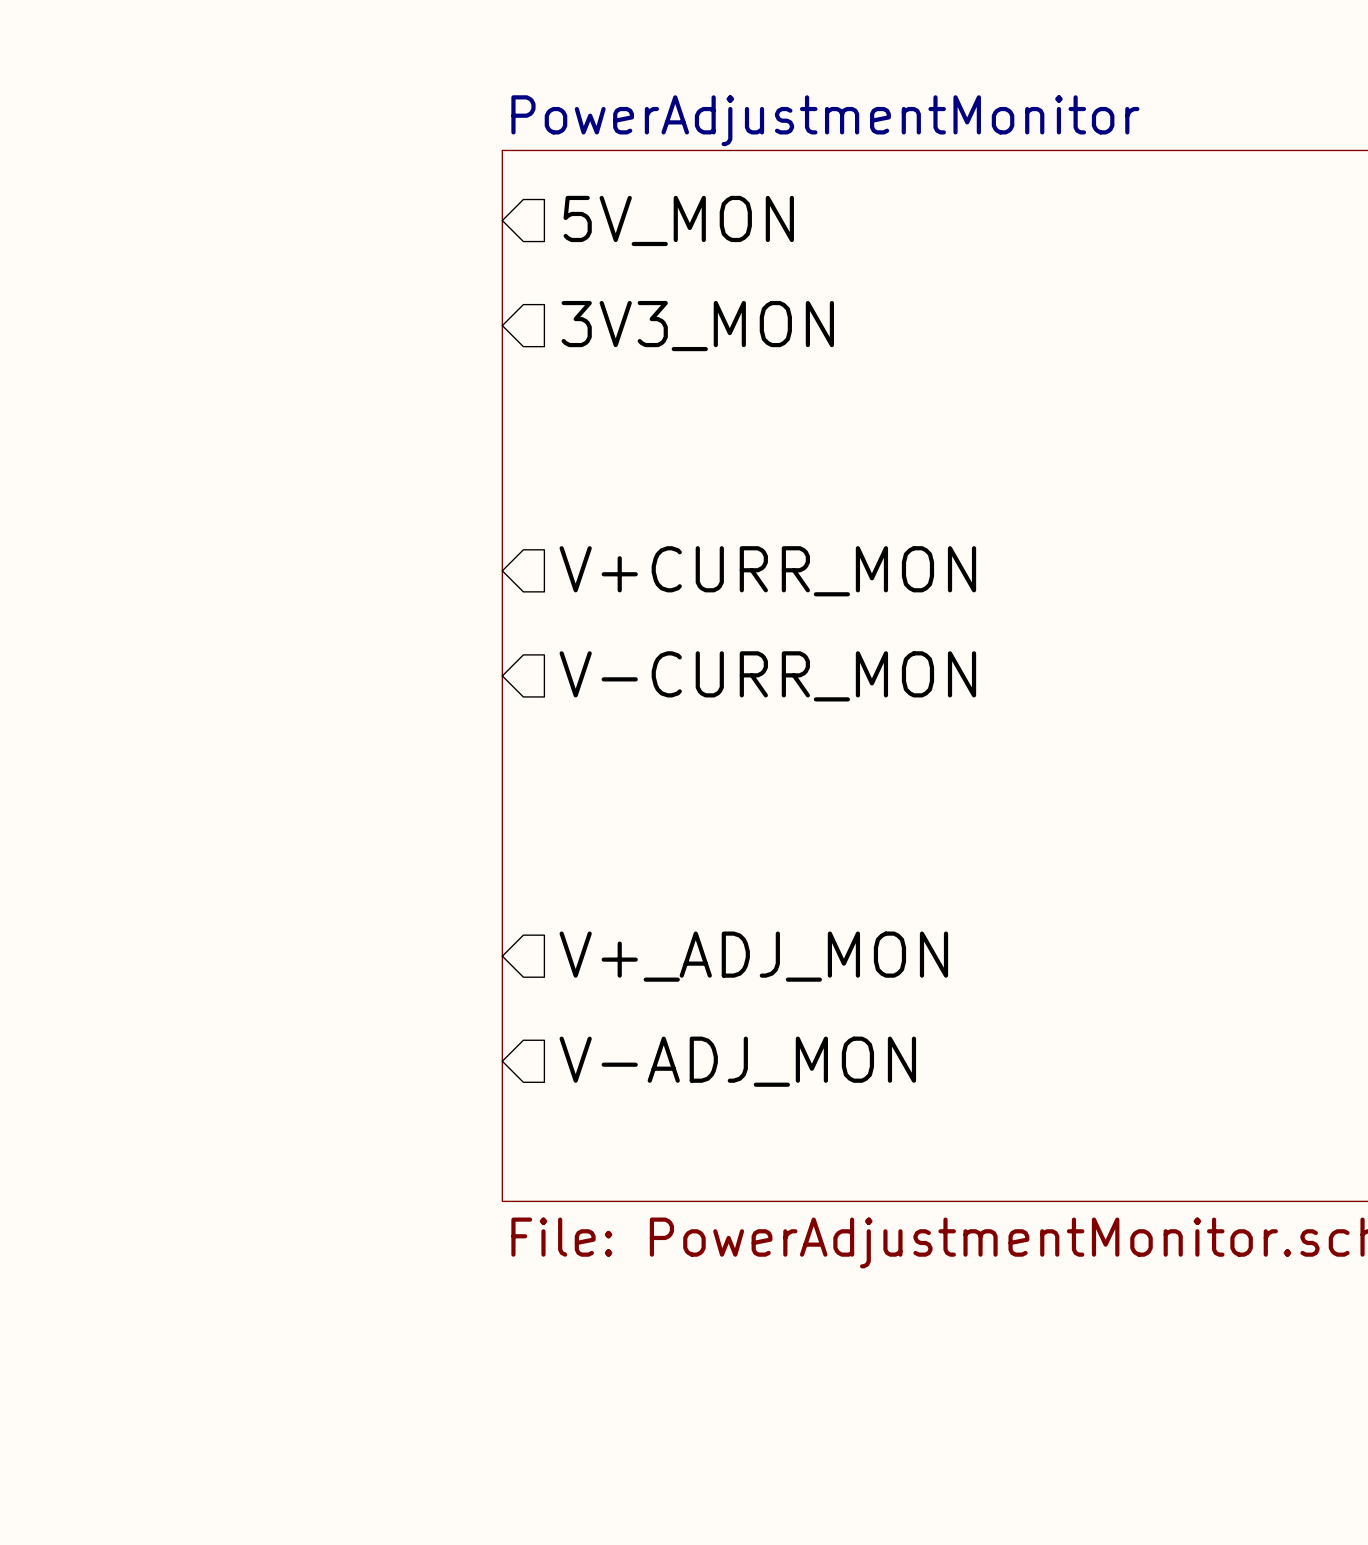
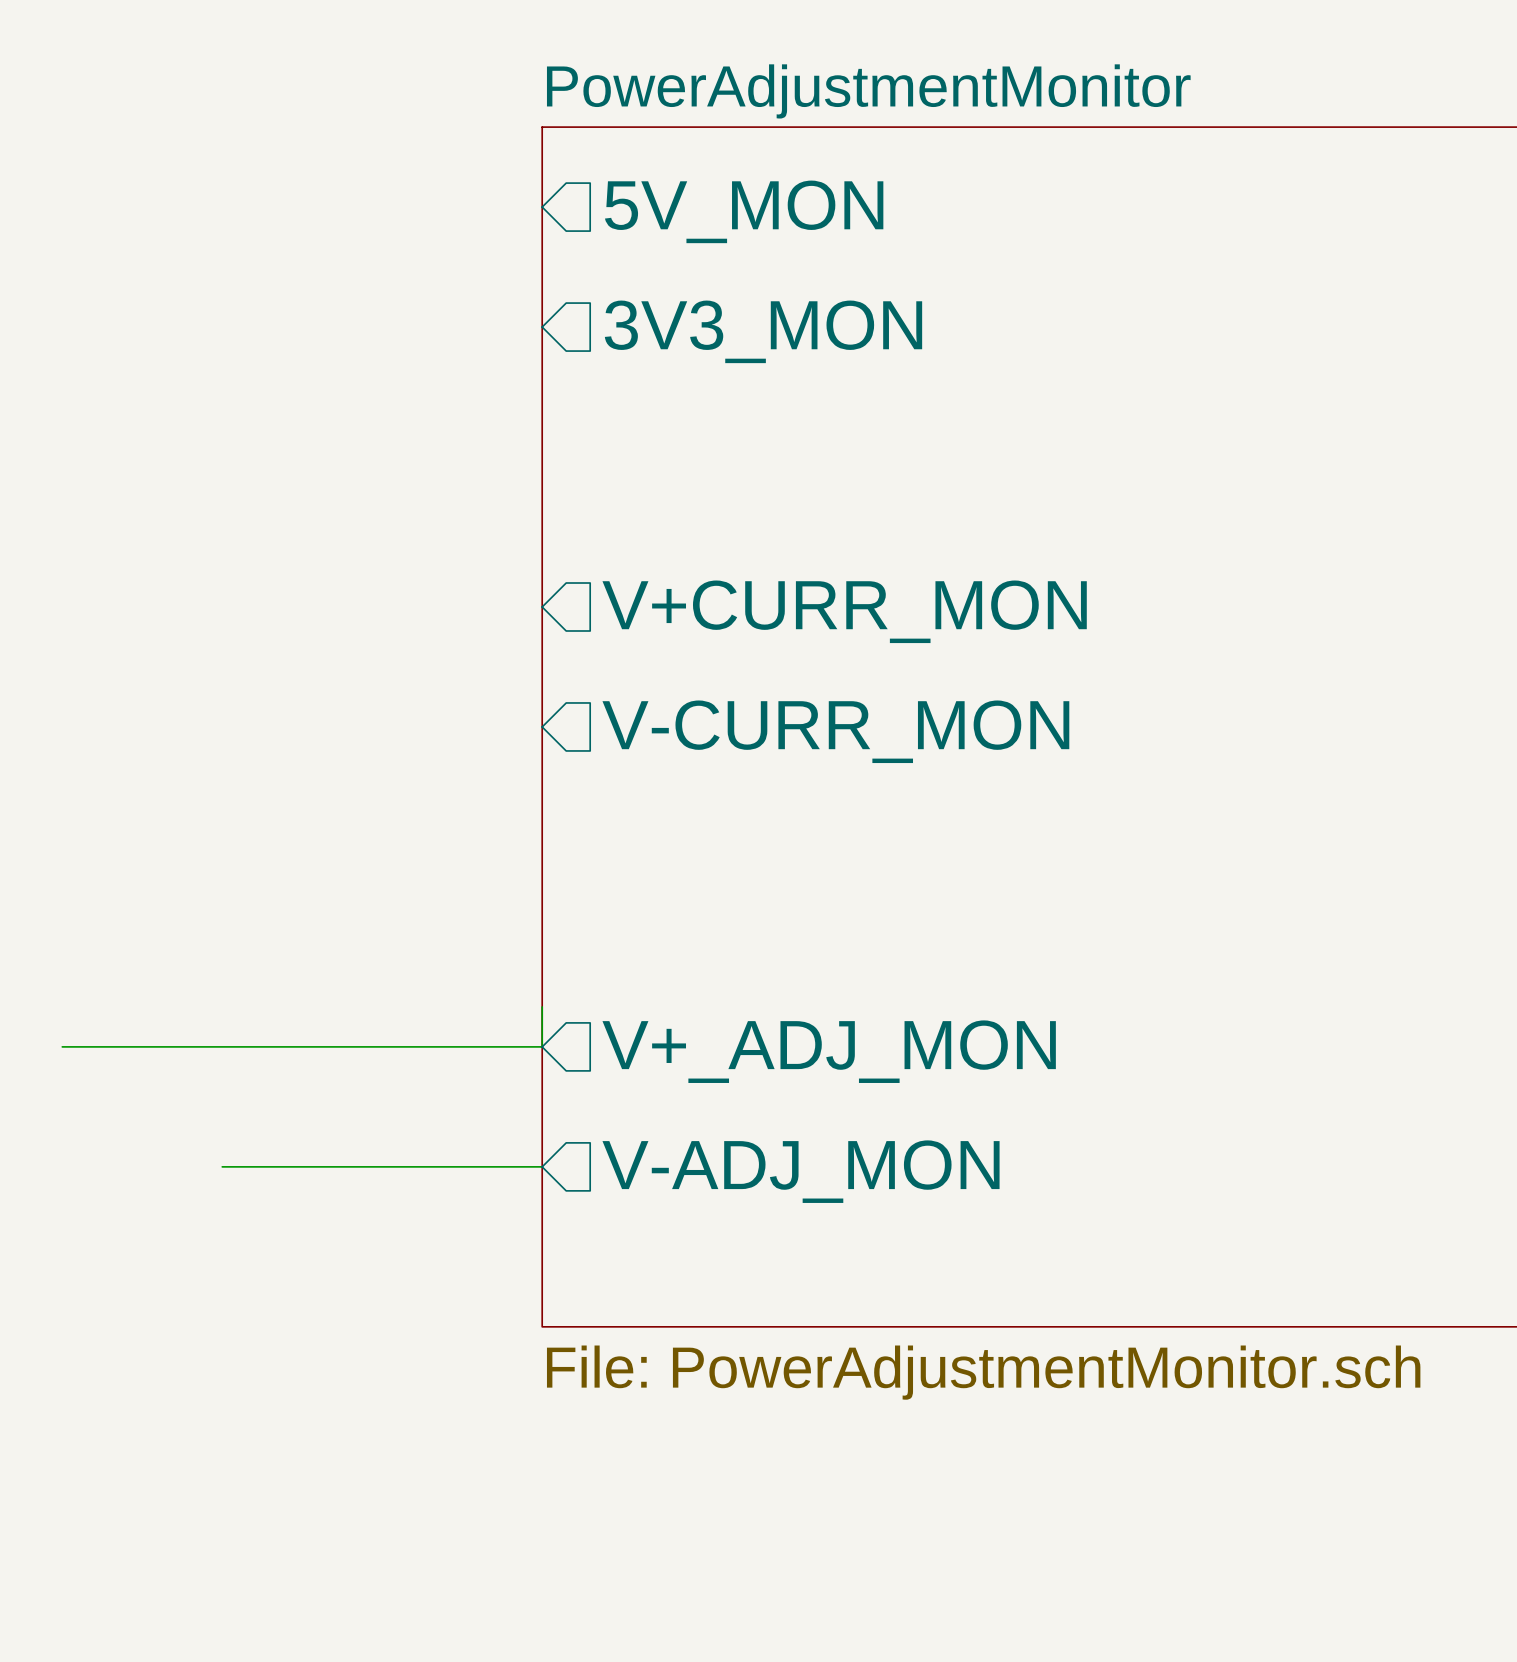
wire: none -> (542, 1006) (542, 1046) (62, 1046)
wire: none -> (222, 1166) (542, 1166)

